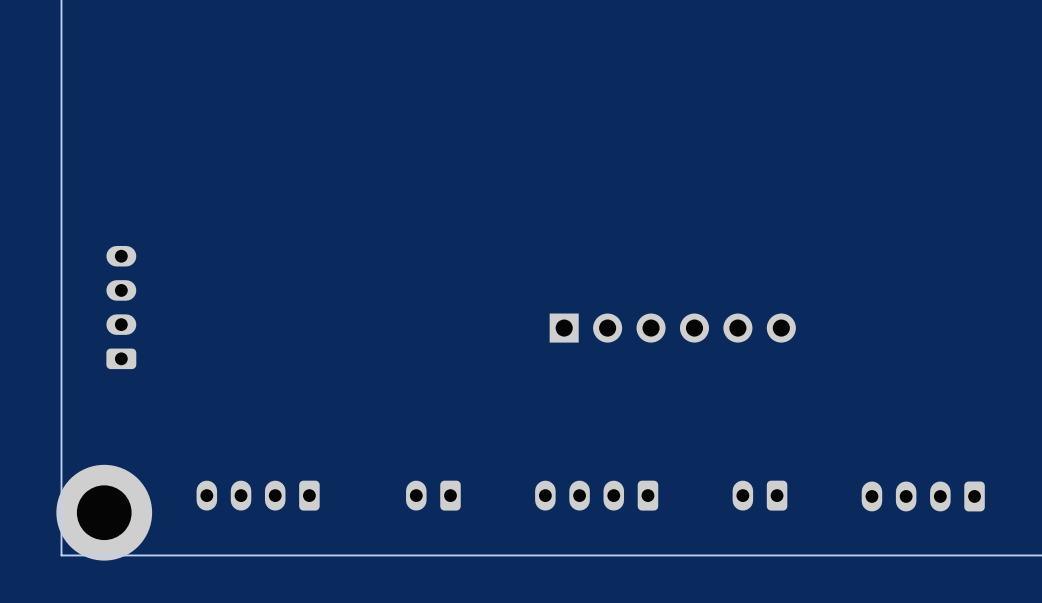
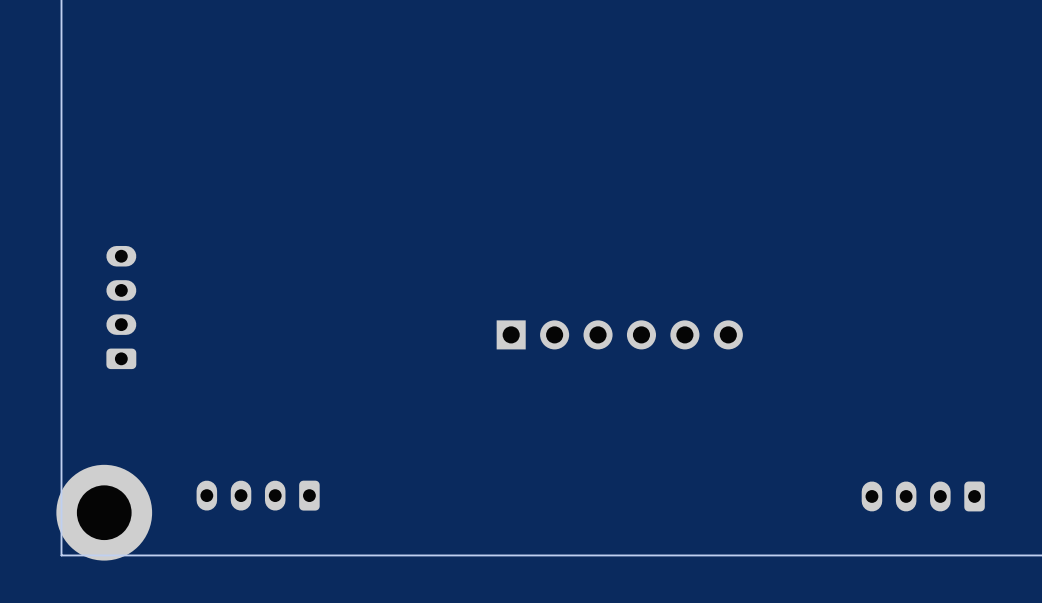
part position: (672, 328) -> (619, 334)
part: (433, 495) -> none
part: (596, 495) -> none
part: (759, 495) -> none

